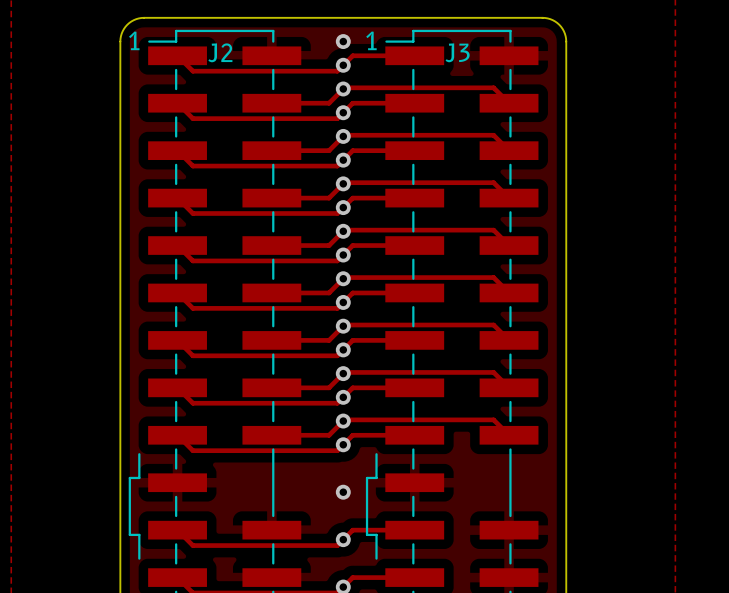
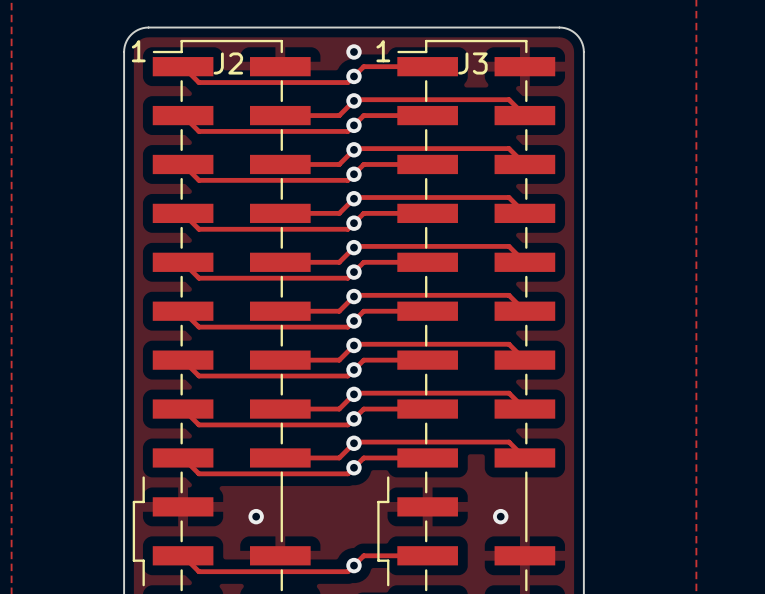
via: none -> (256, 516)
via: (343, 492) -> none
via: none -> (500, 516)

